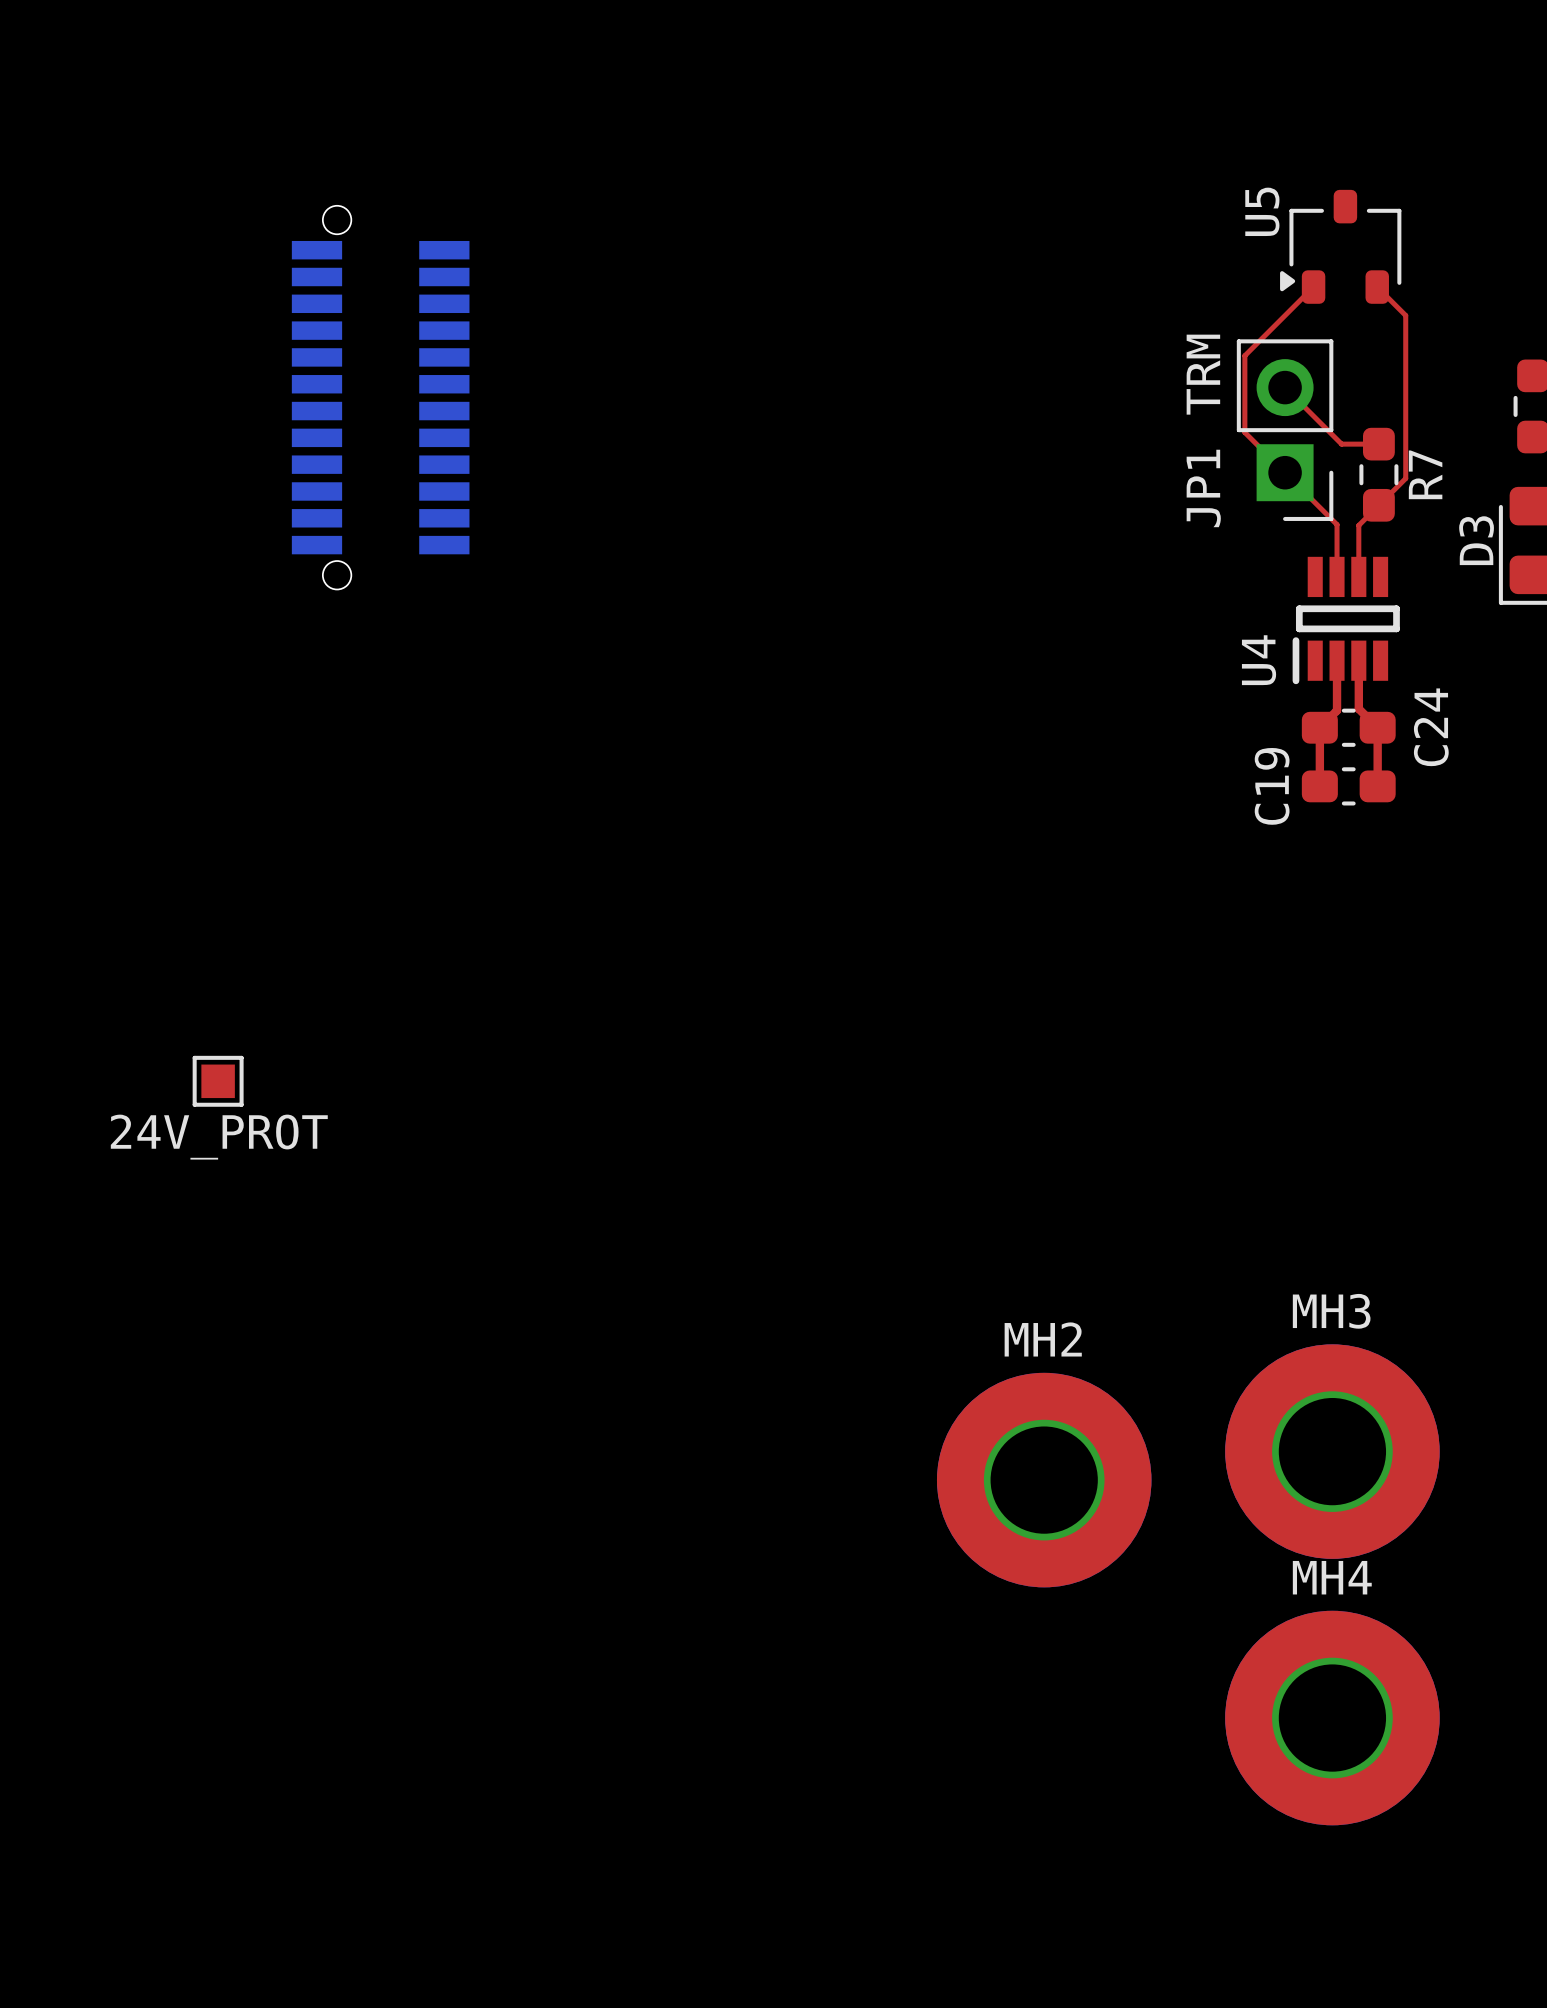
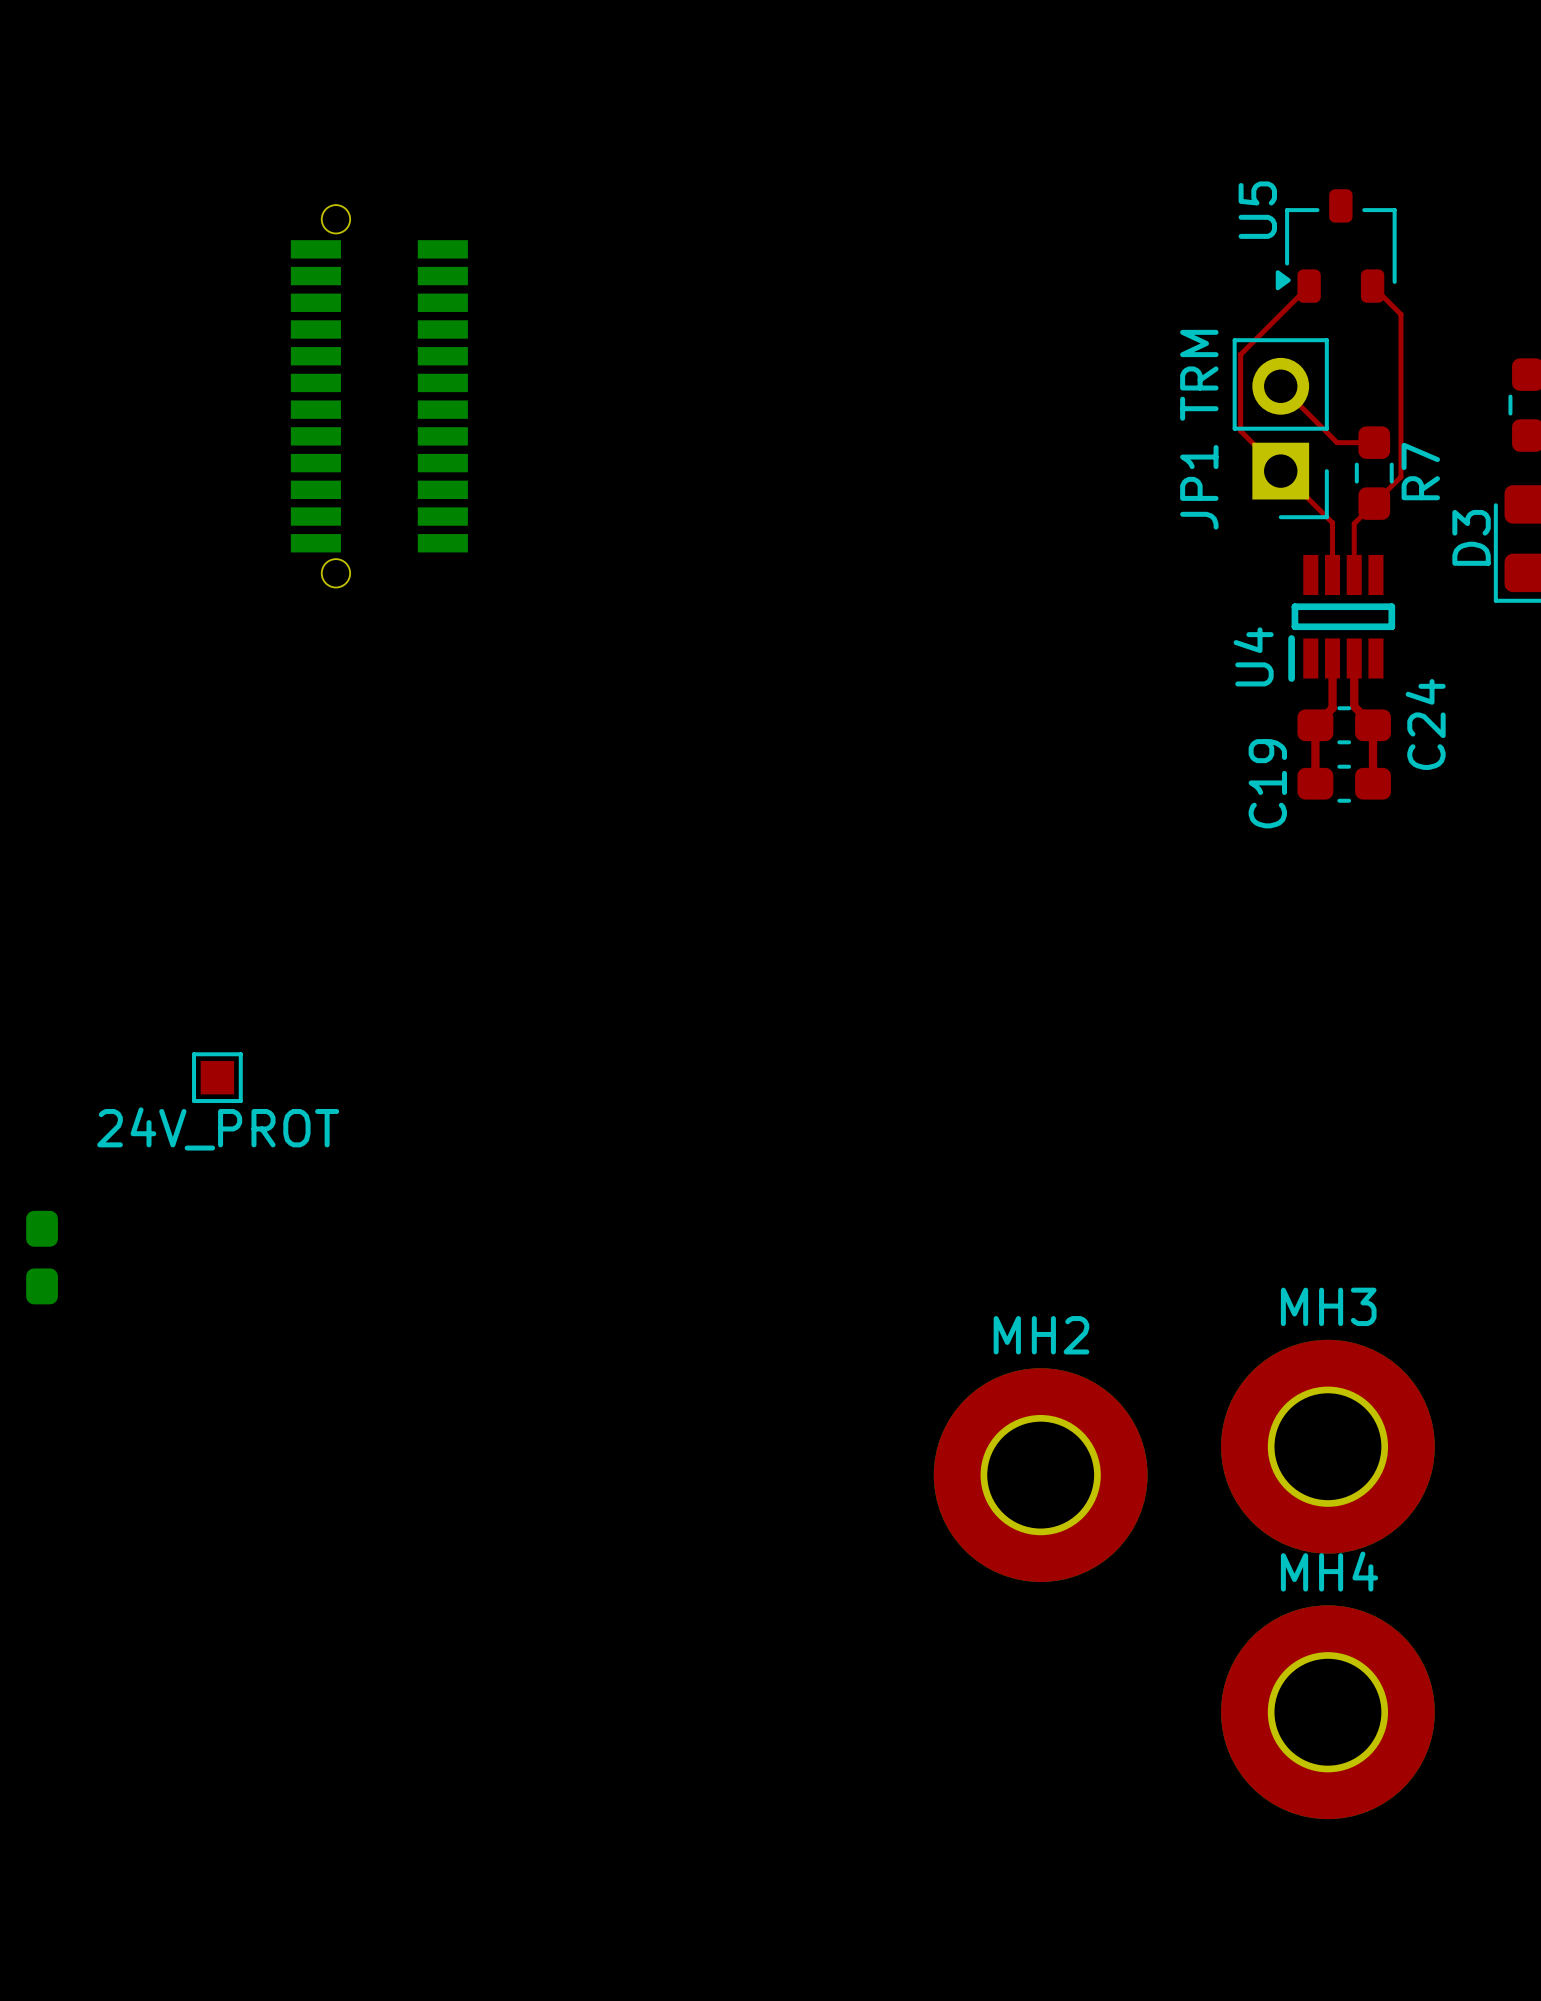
part: none -> (42, 1257)

